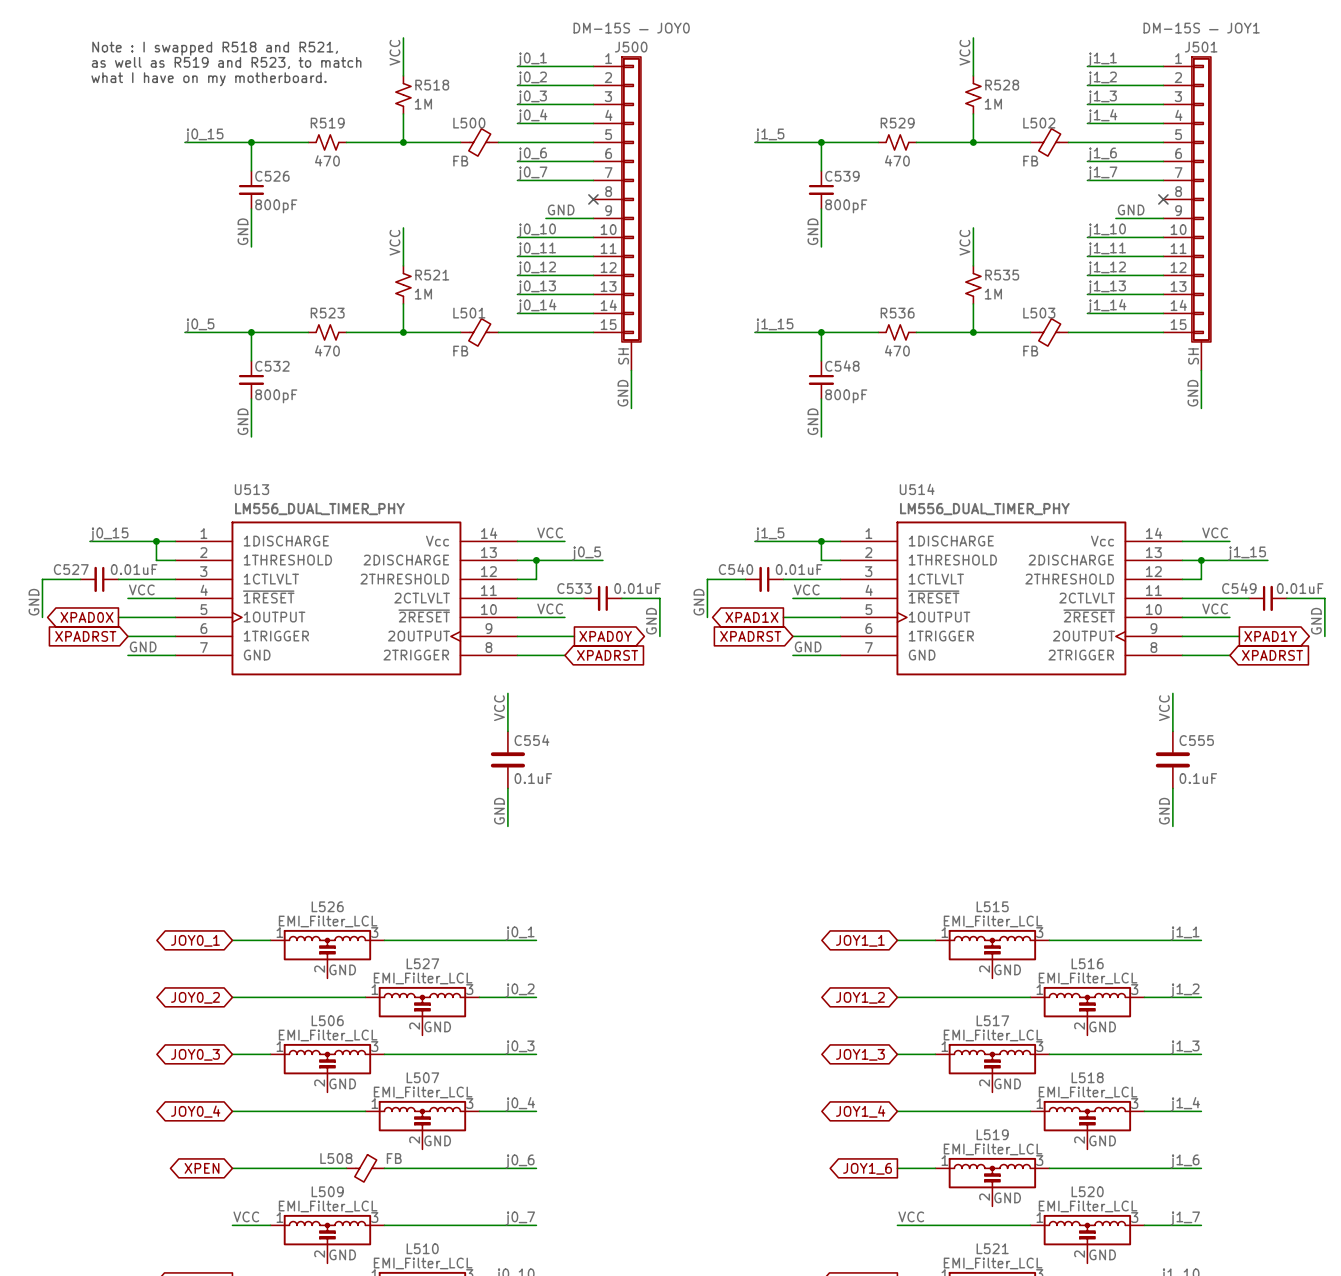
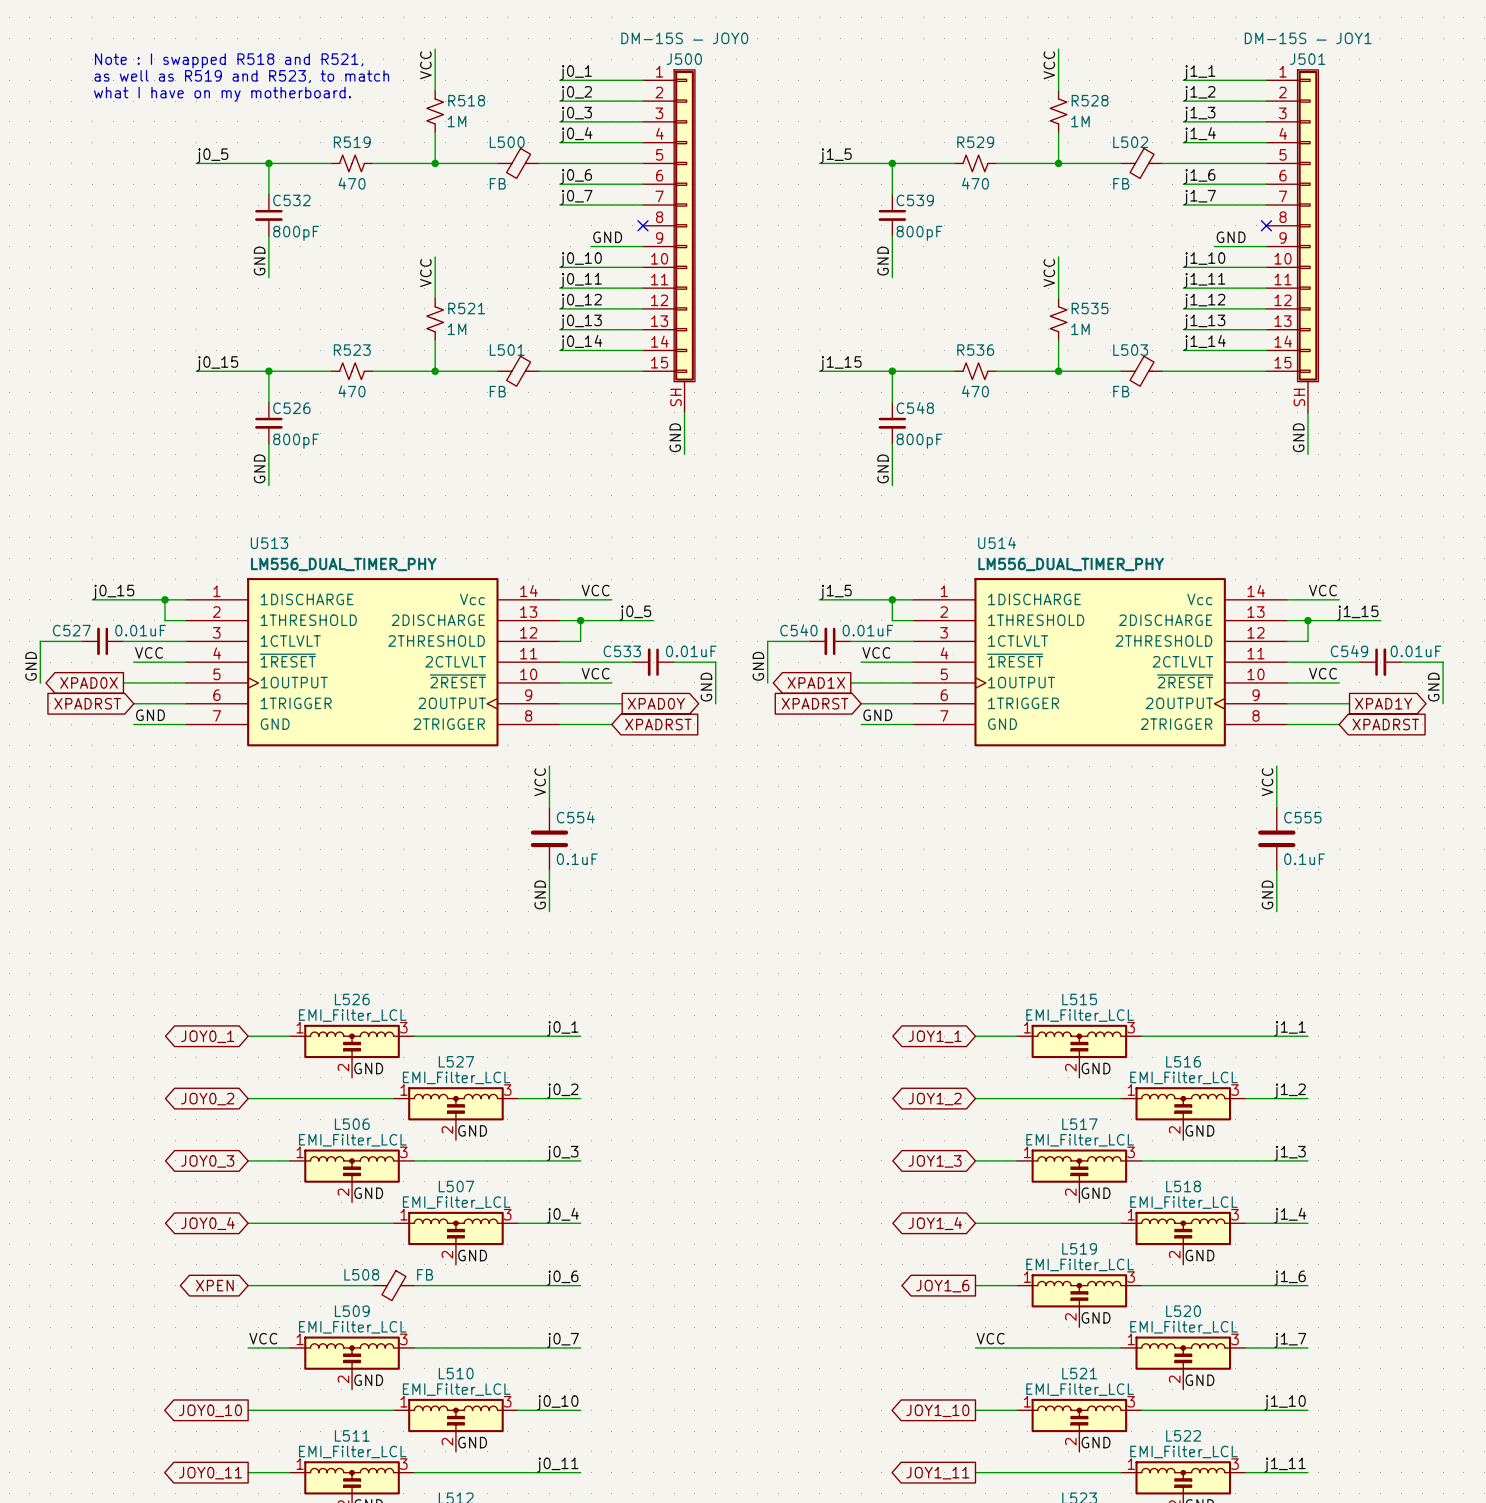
label: j0_15 (204, 135) -> j0_5 (212, 155)
C526 name: C526 (272, 176) -> C532 (291, 200)
label: j0_5 (199, 325) -> j0_15 (217, 363)
C532 name: C532 (272, 366) -> C526 (291, 408)

